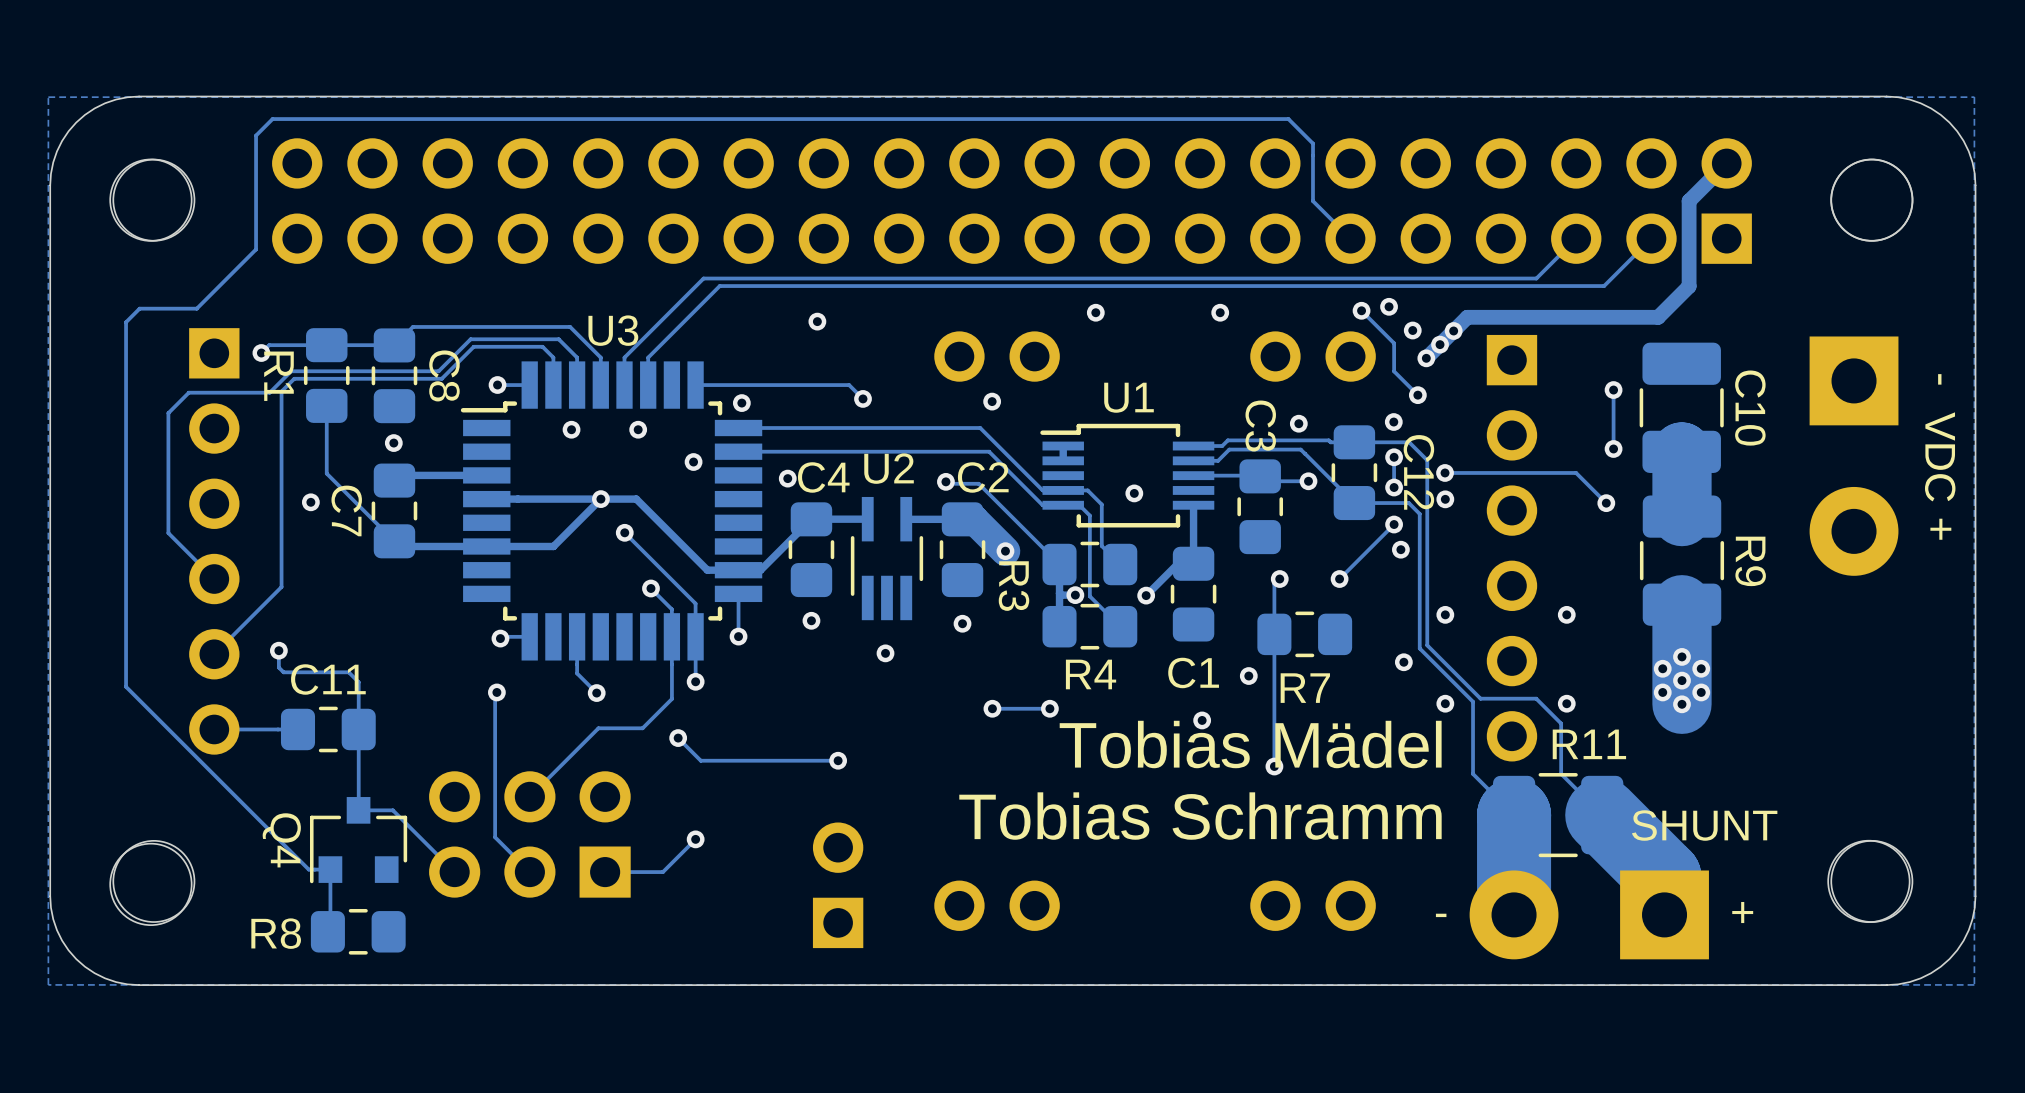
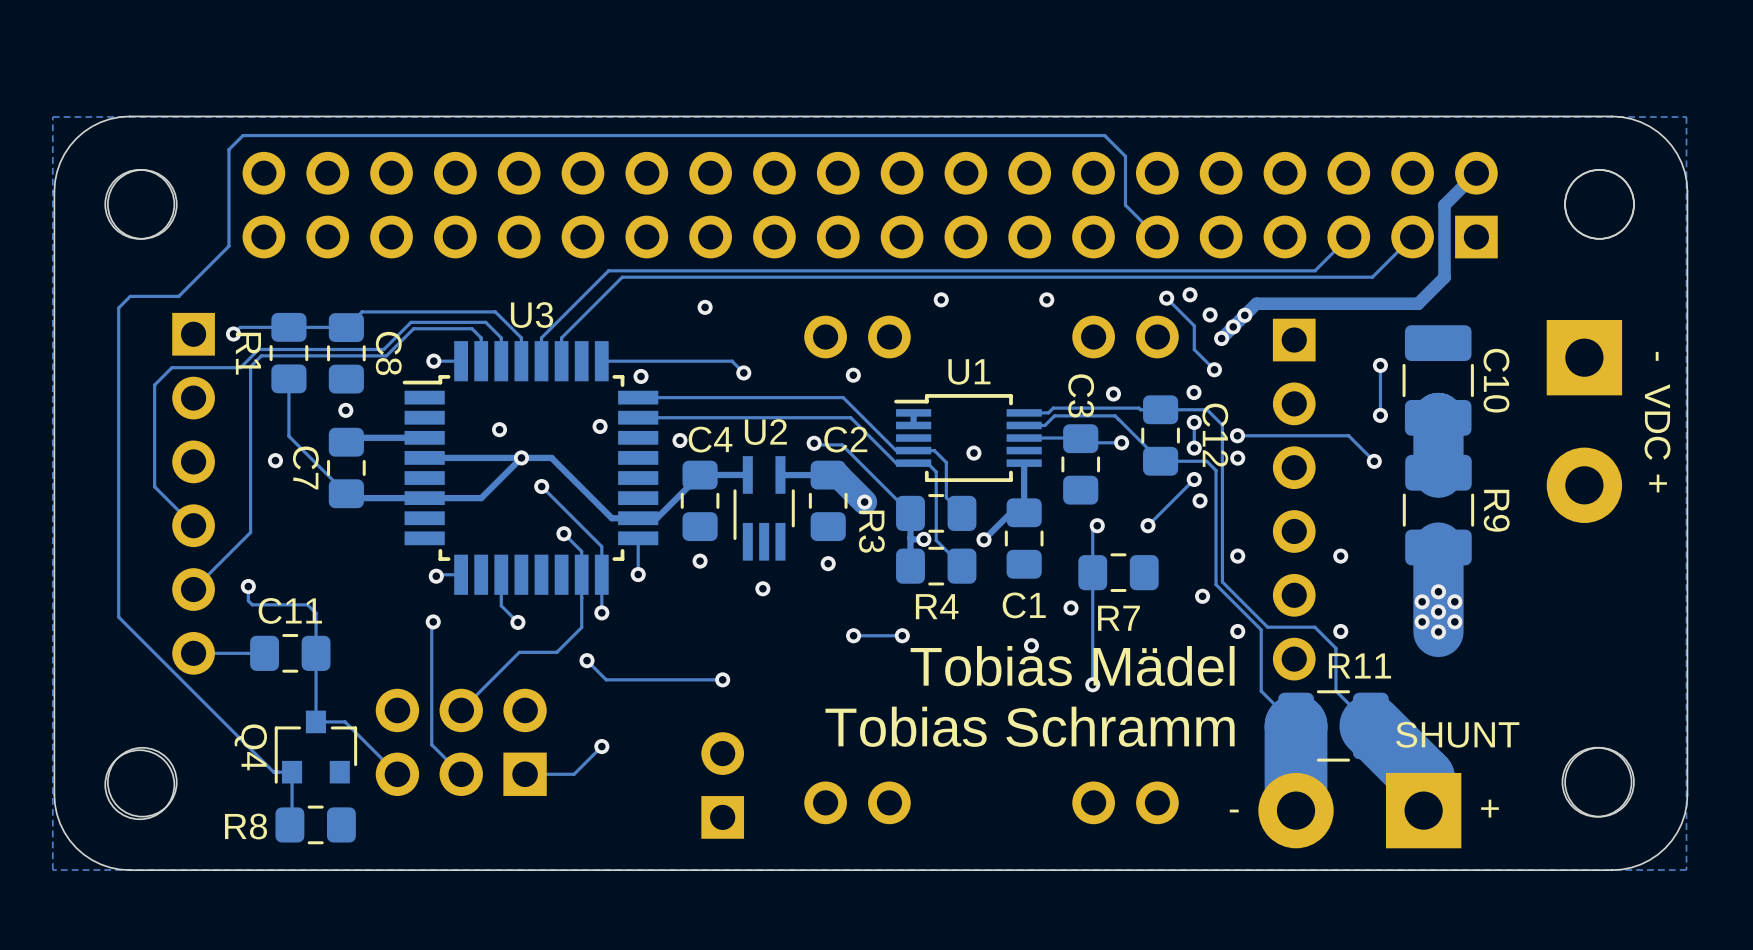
via: (571, 429) -> none
via: (638, 429) -> none
via: none -> (499, 429)

